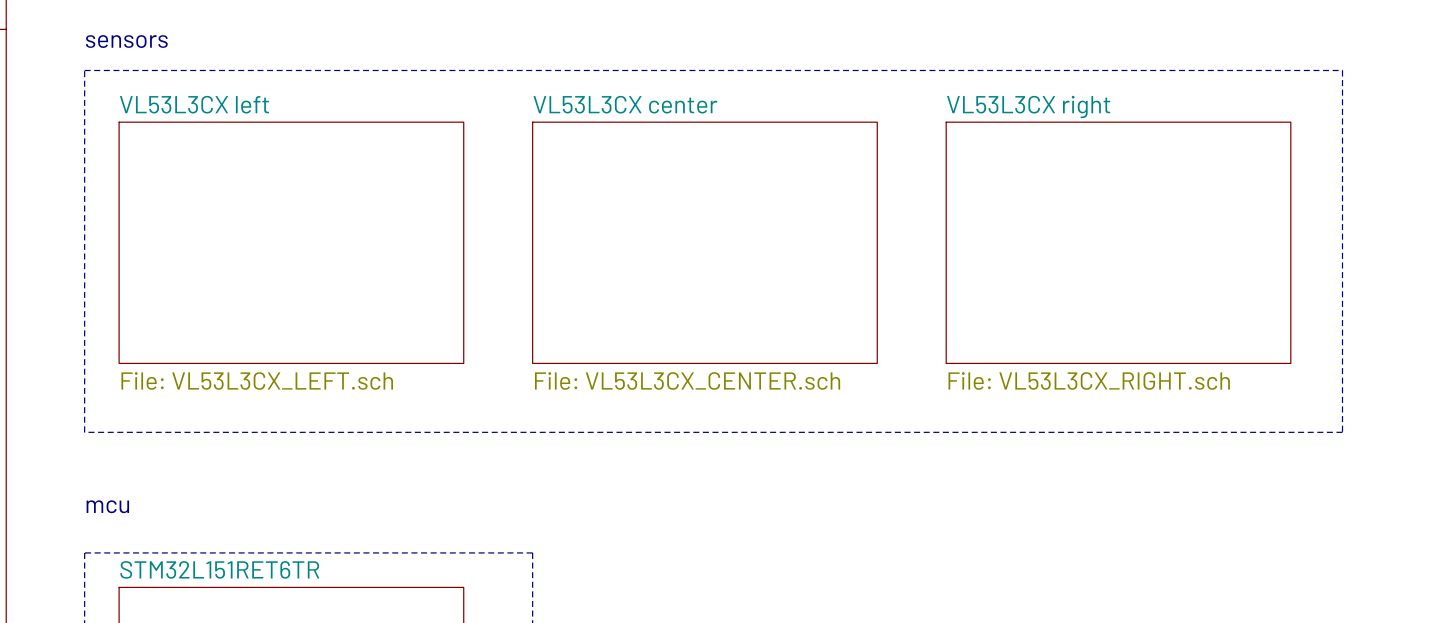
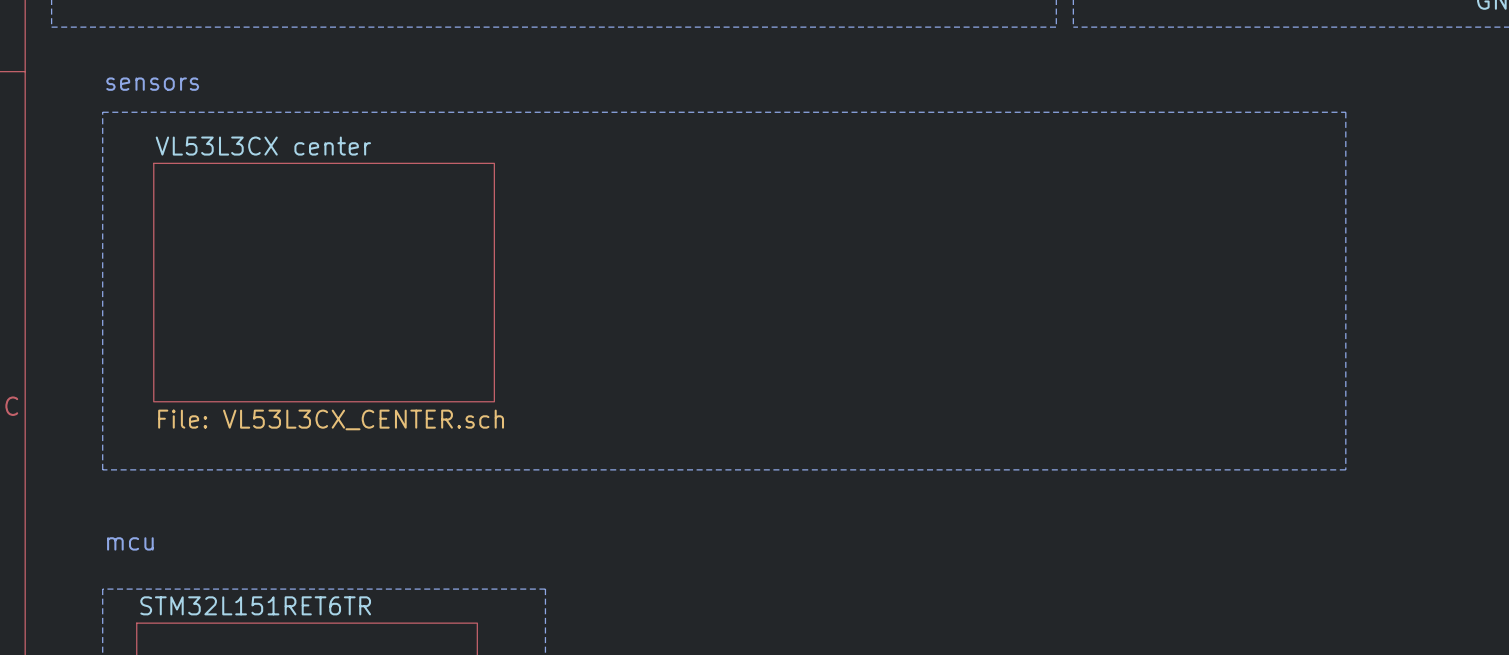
sheet VL53L3CX left: File: VL53L3CX_LEFT.sch (291, 242) -> none
sheet VL53L3CX center position: (704, 242) -> (324, 282)
sheet VL53L3CX right: File: VL53L3CX_RIGHT.sch (1118, 242) -> none

